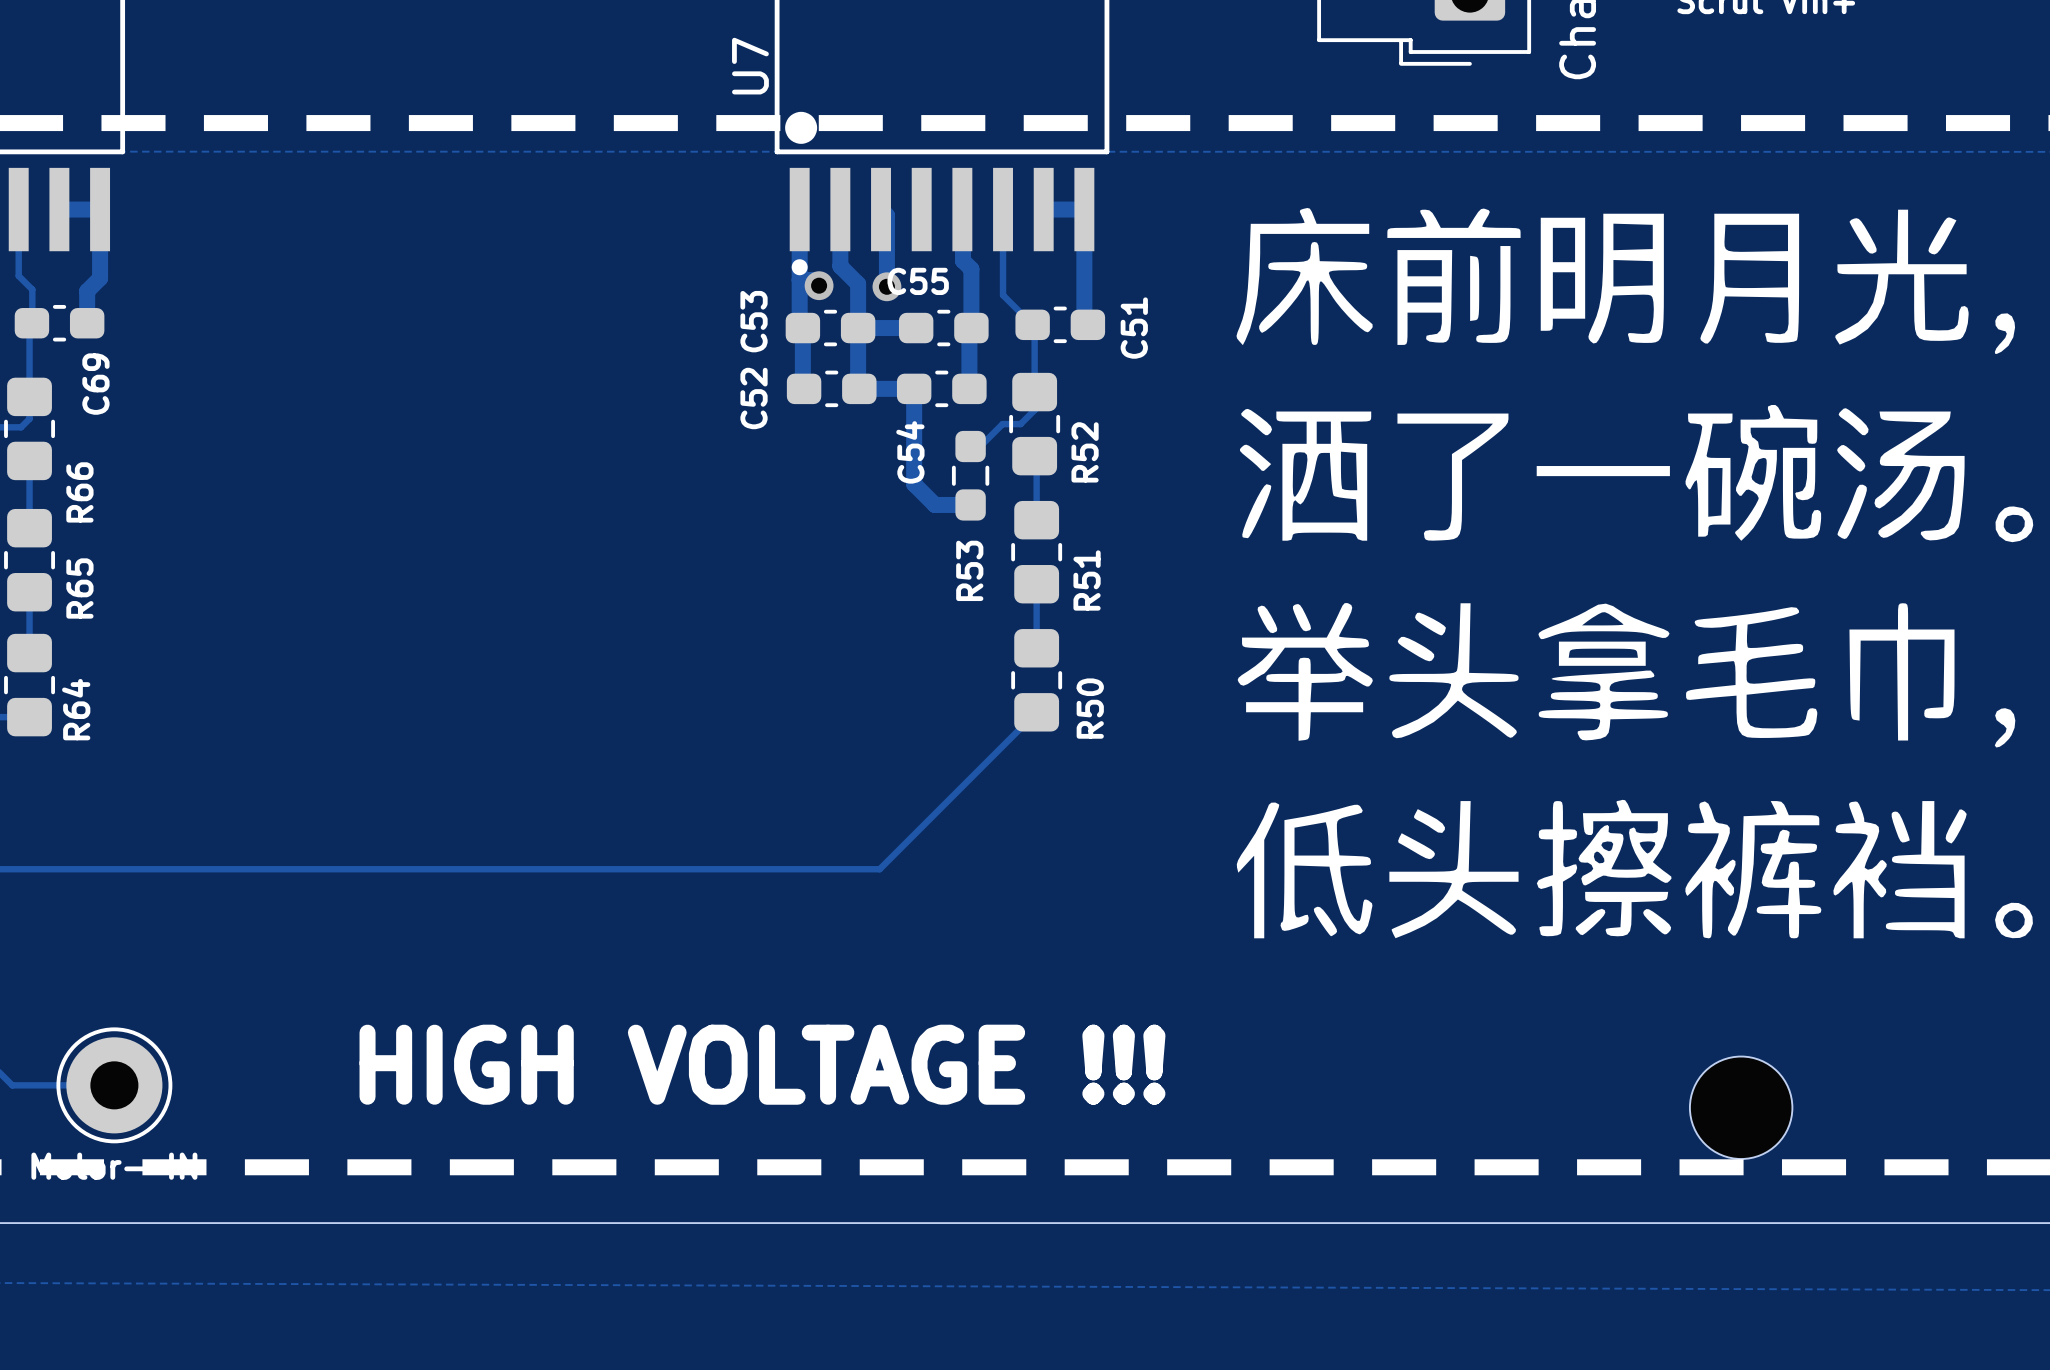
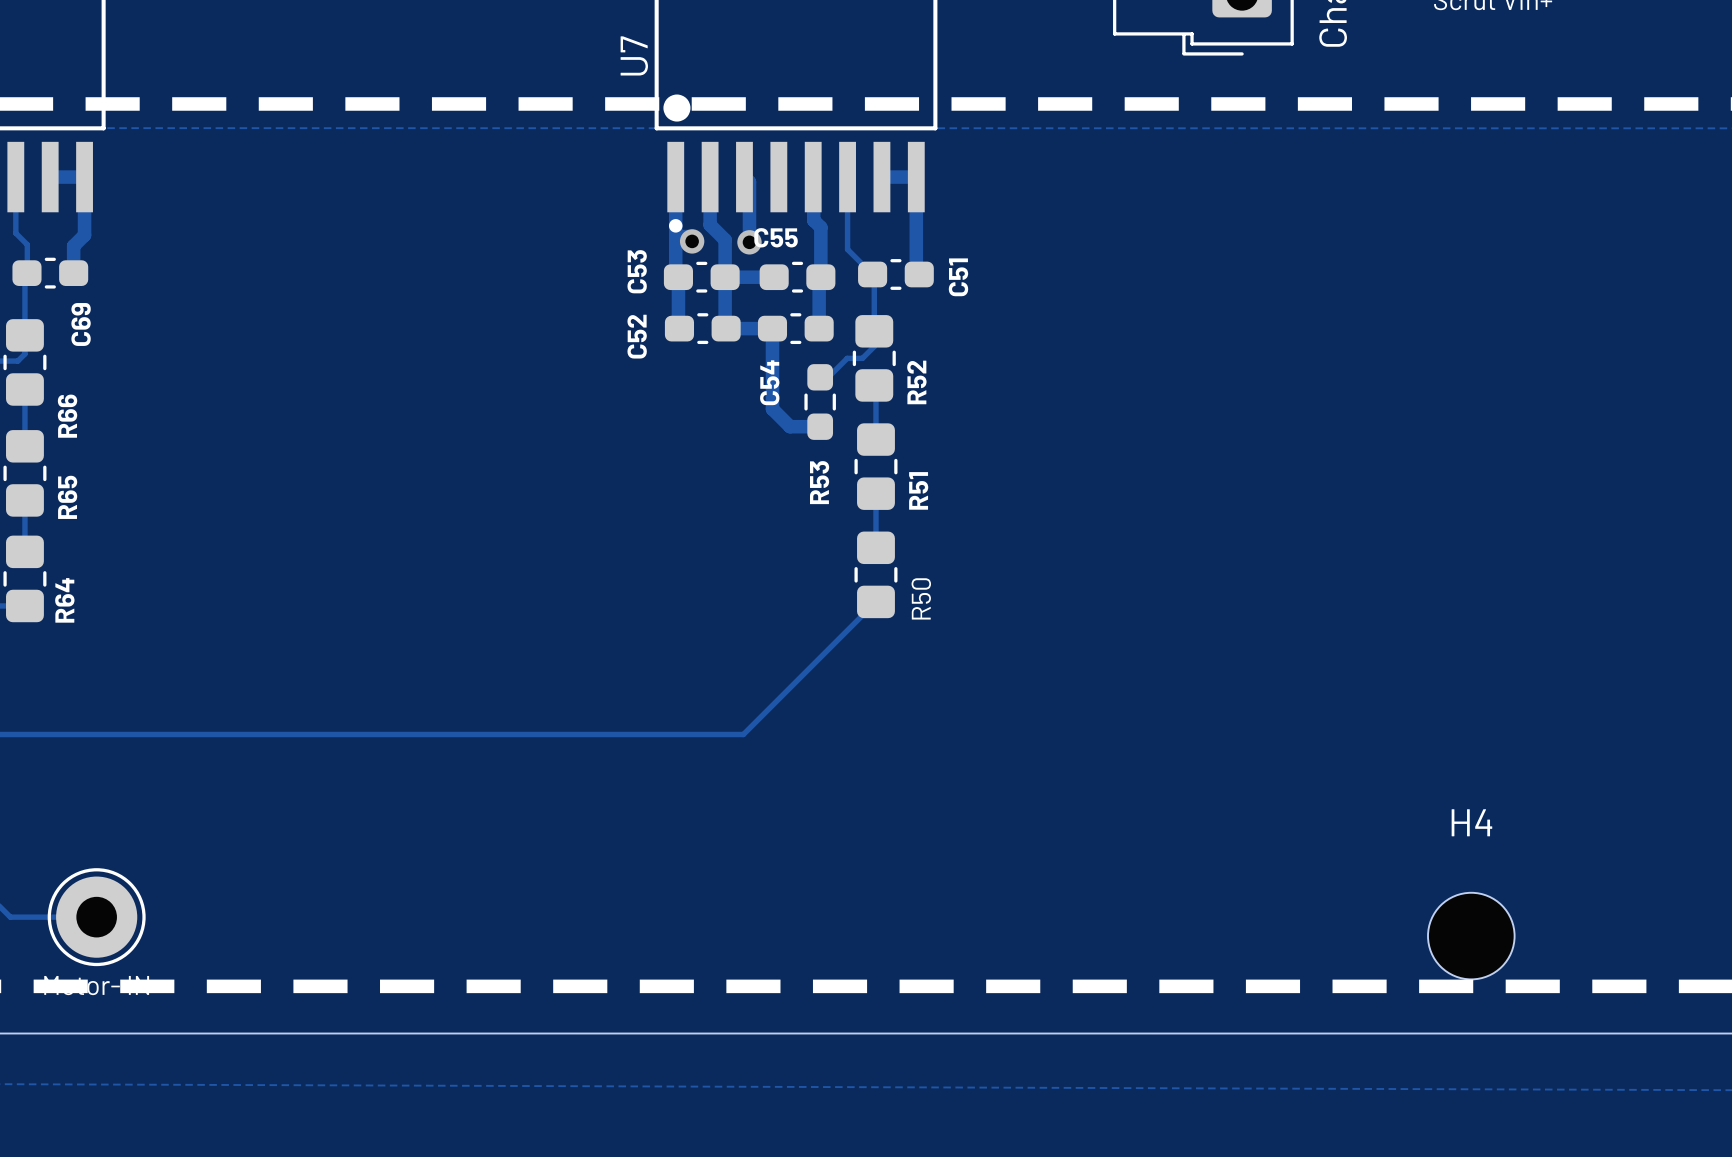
drawing: [1236, 207, 2034, 939] -> none
H4 name: none -> H4 (1471, 822)
text: HIGH VOLTAGE !!! (762, 1064) -> none

